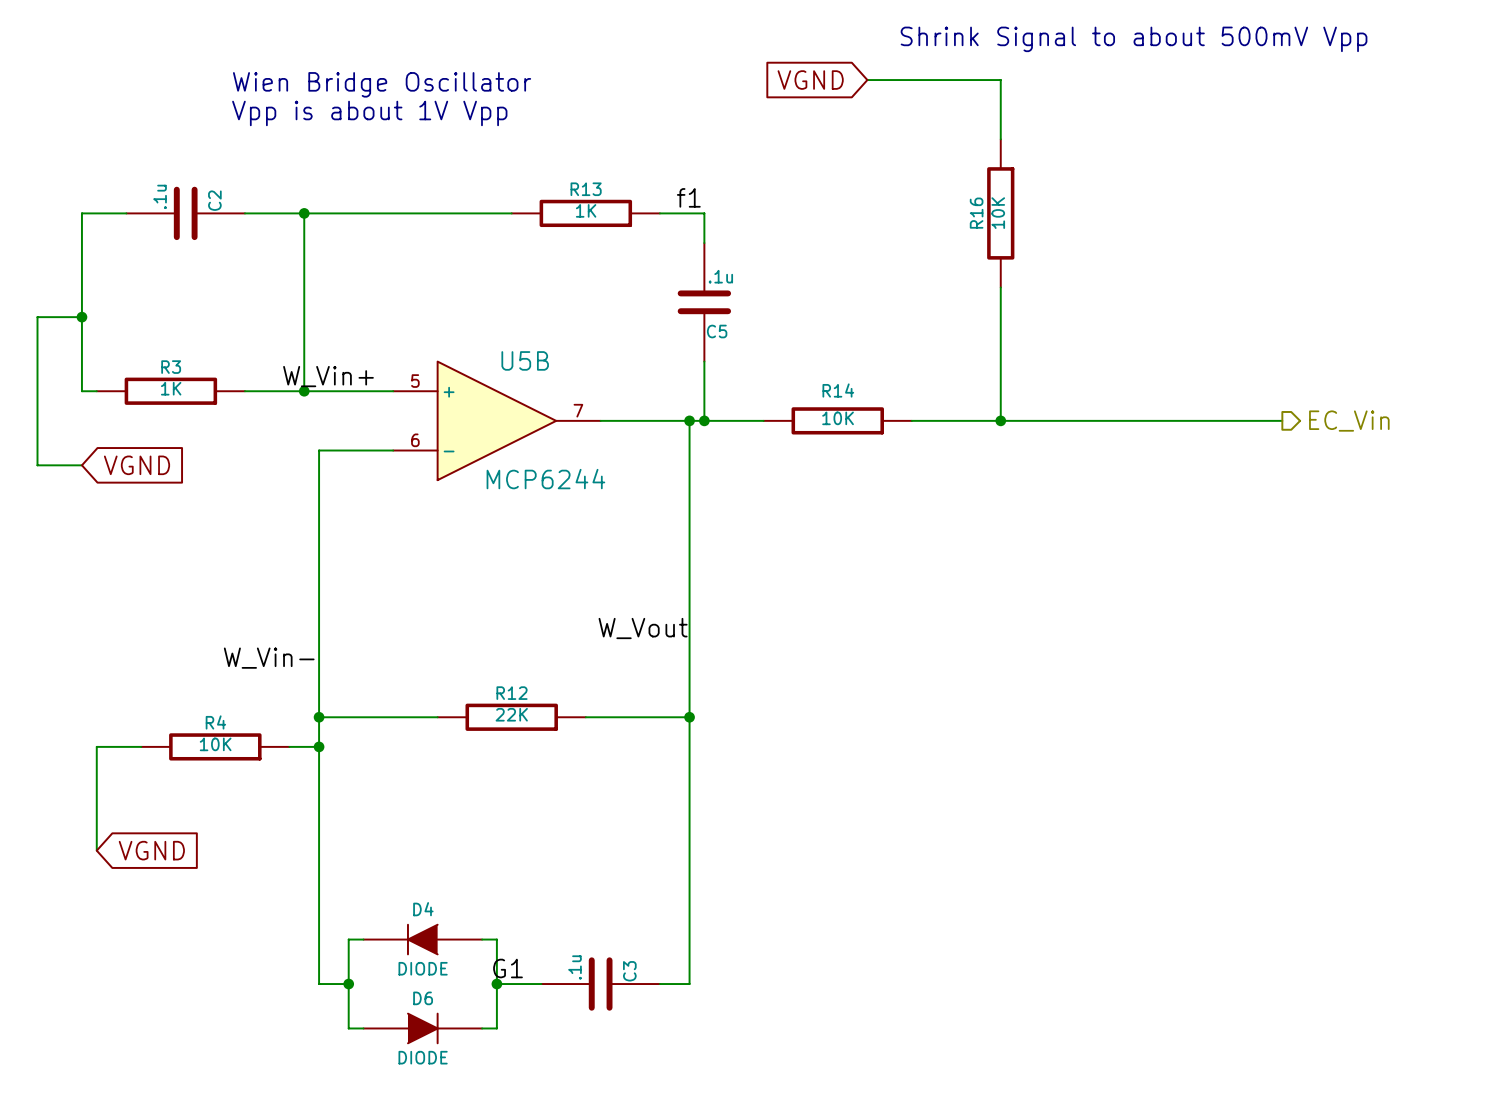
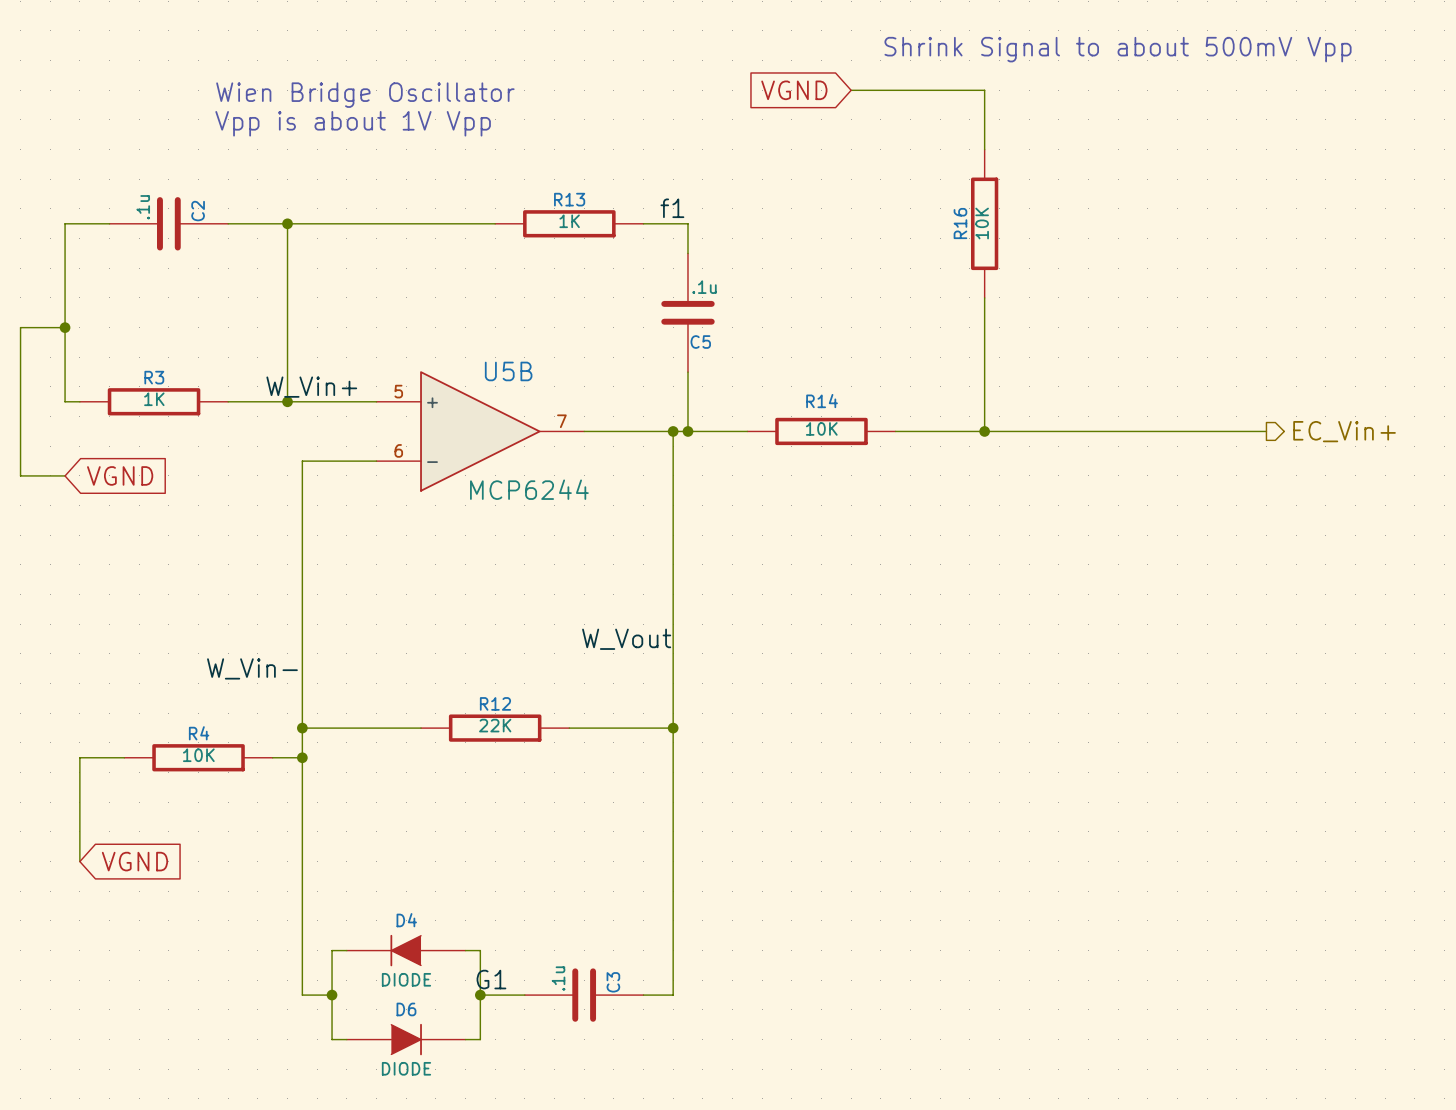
hierarchical label: EC_Vin (1349, 421) -> EC_Vin+ (1344, 431)

